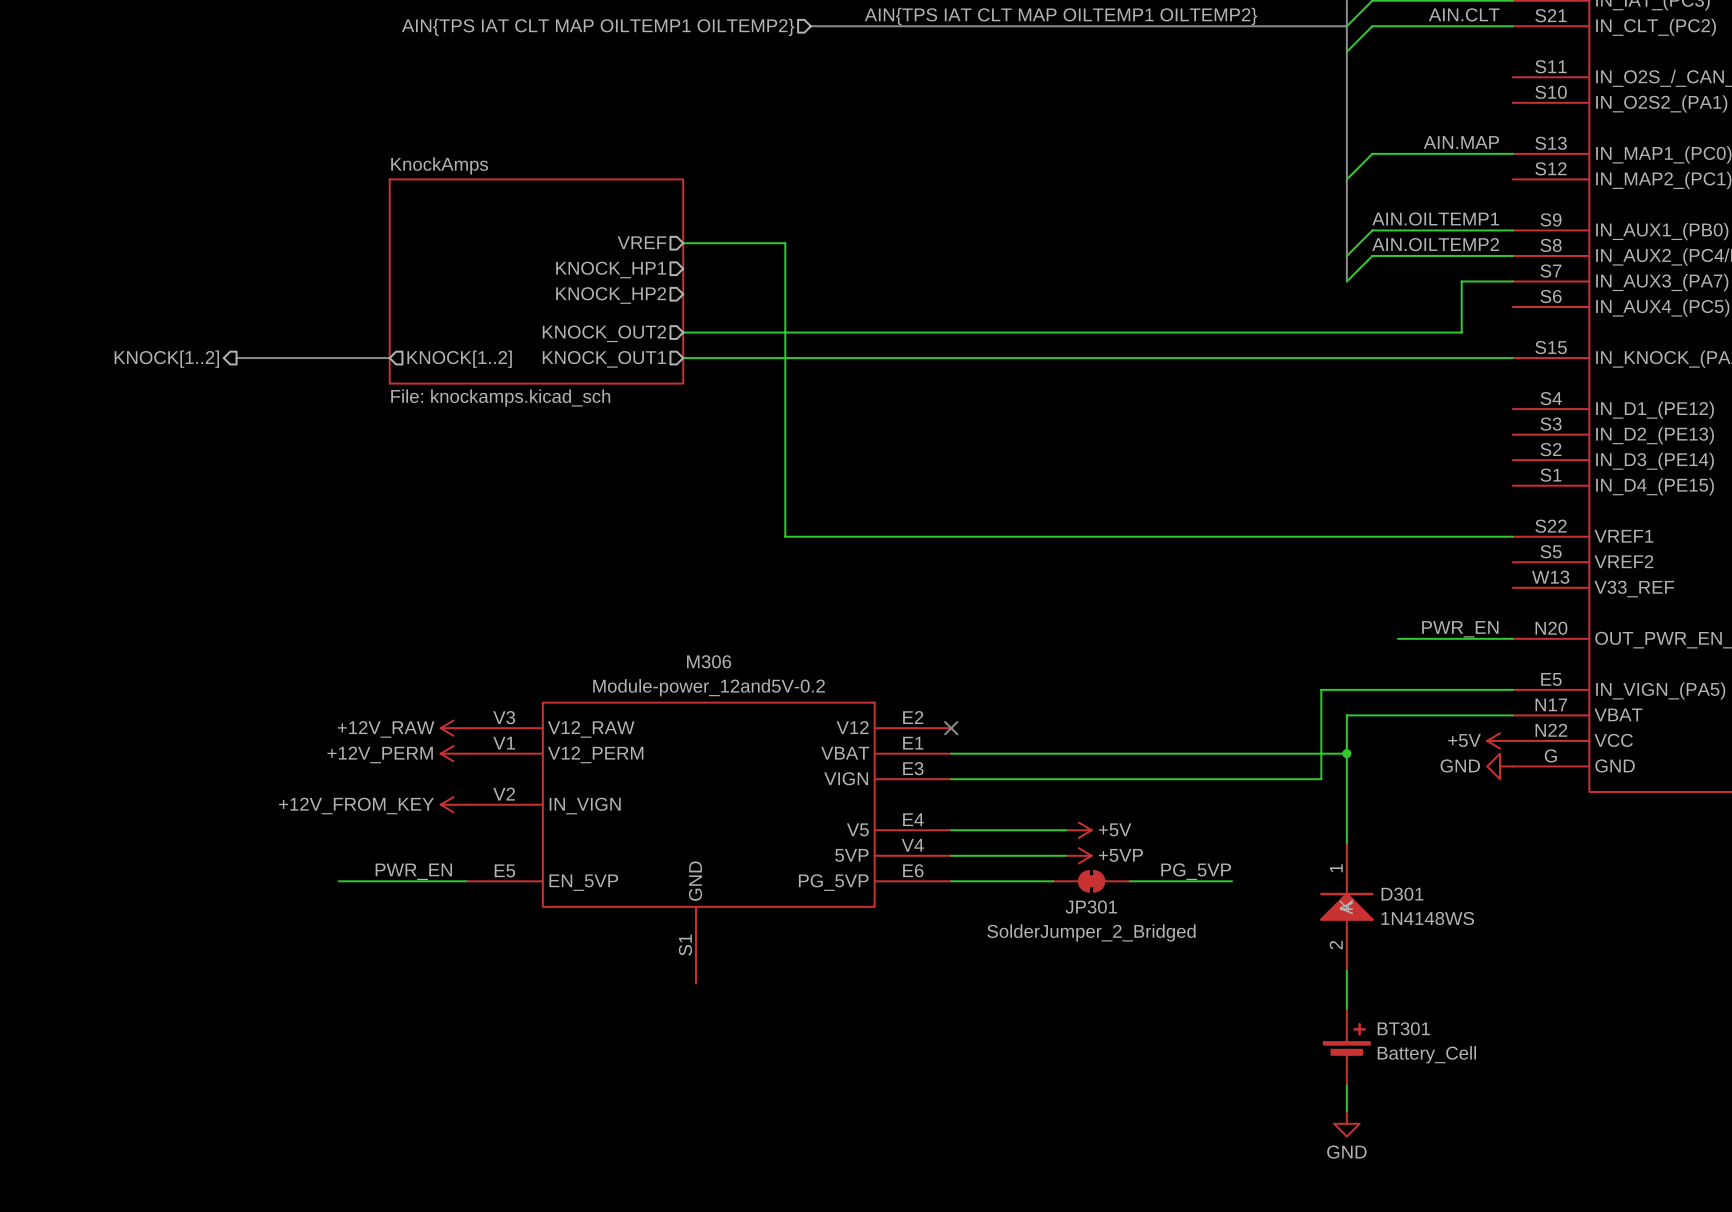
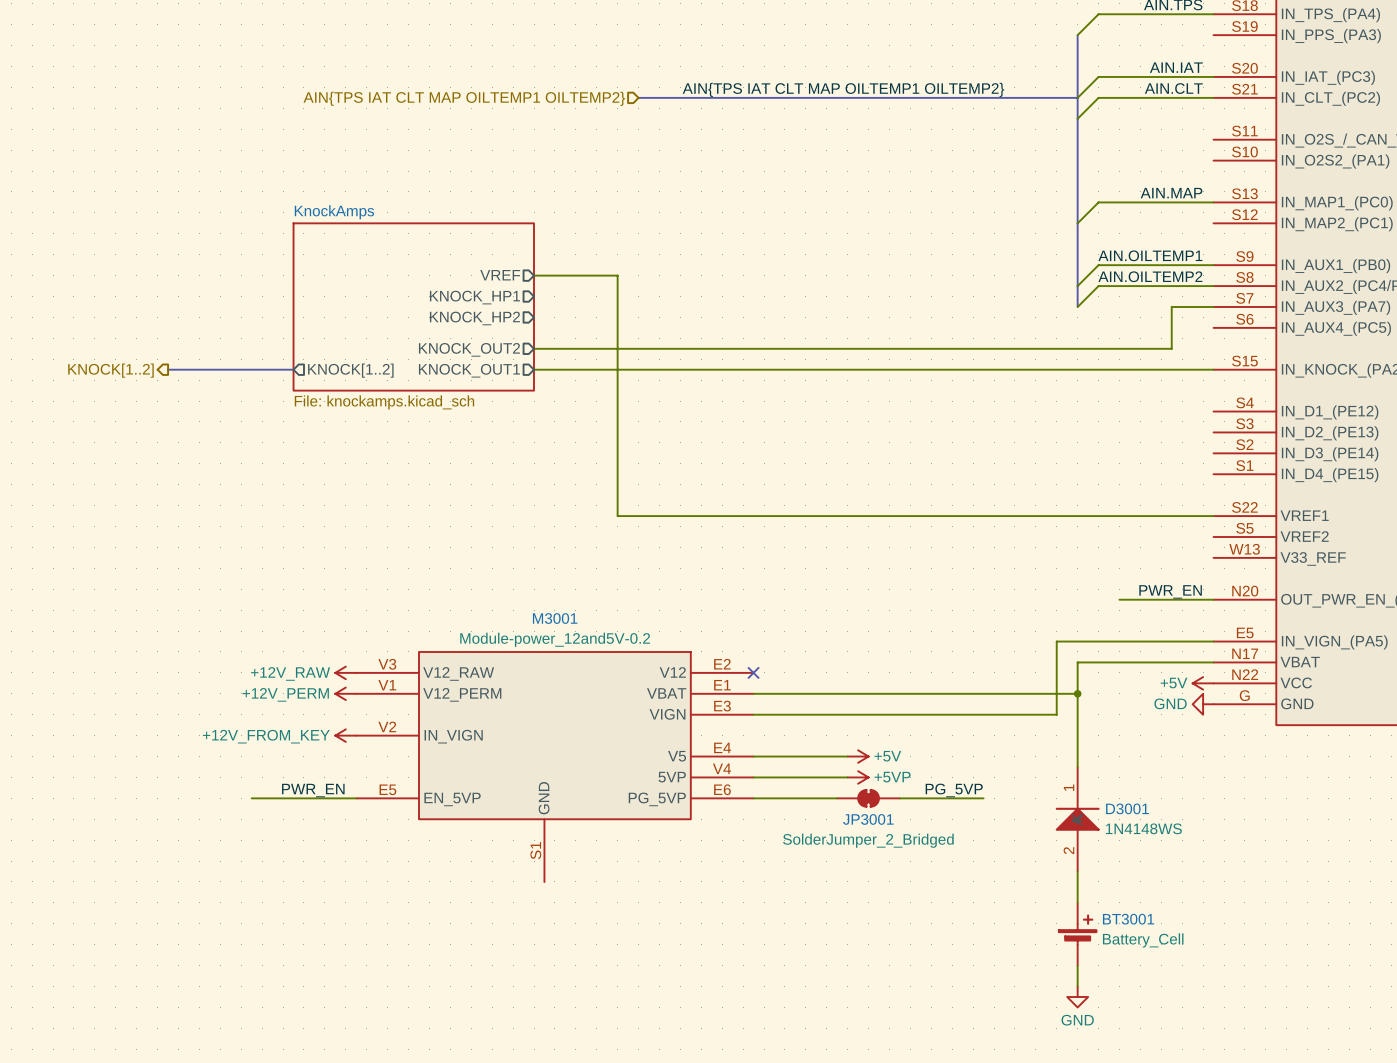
M306 name: M306 (709, 661) -> M3001 (555, 618)
D301 name: D301 (1402, 894) -> D3001 (1127, 808)
JP301 name: JP301 (1091, 907) -> JP3001 (868, 819)
BT301 name: BT301 (1403, 1028) -> BT3001 (1128, 919)

